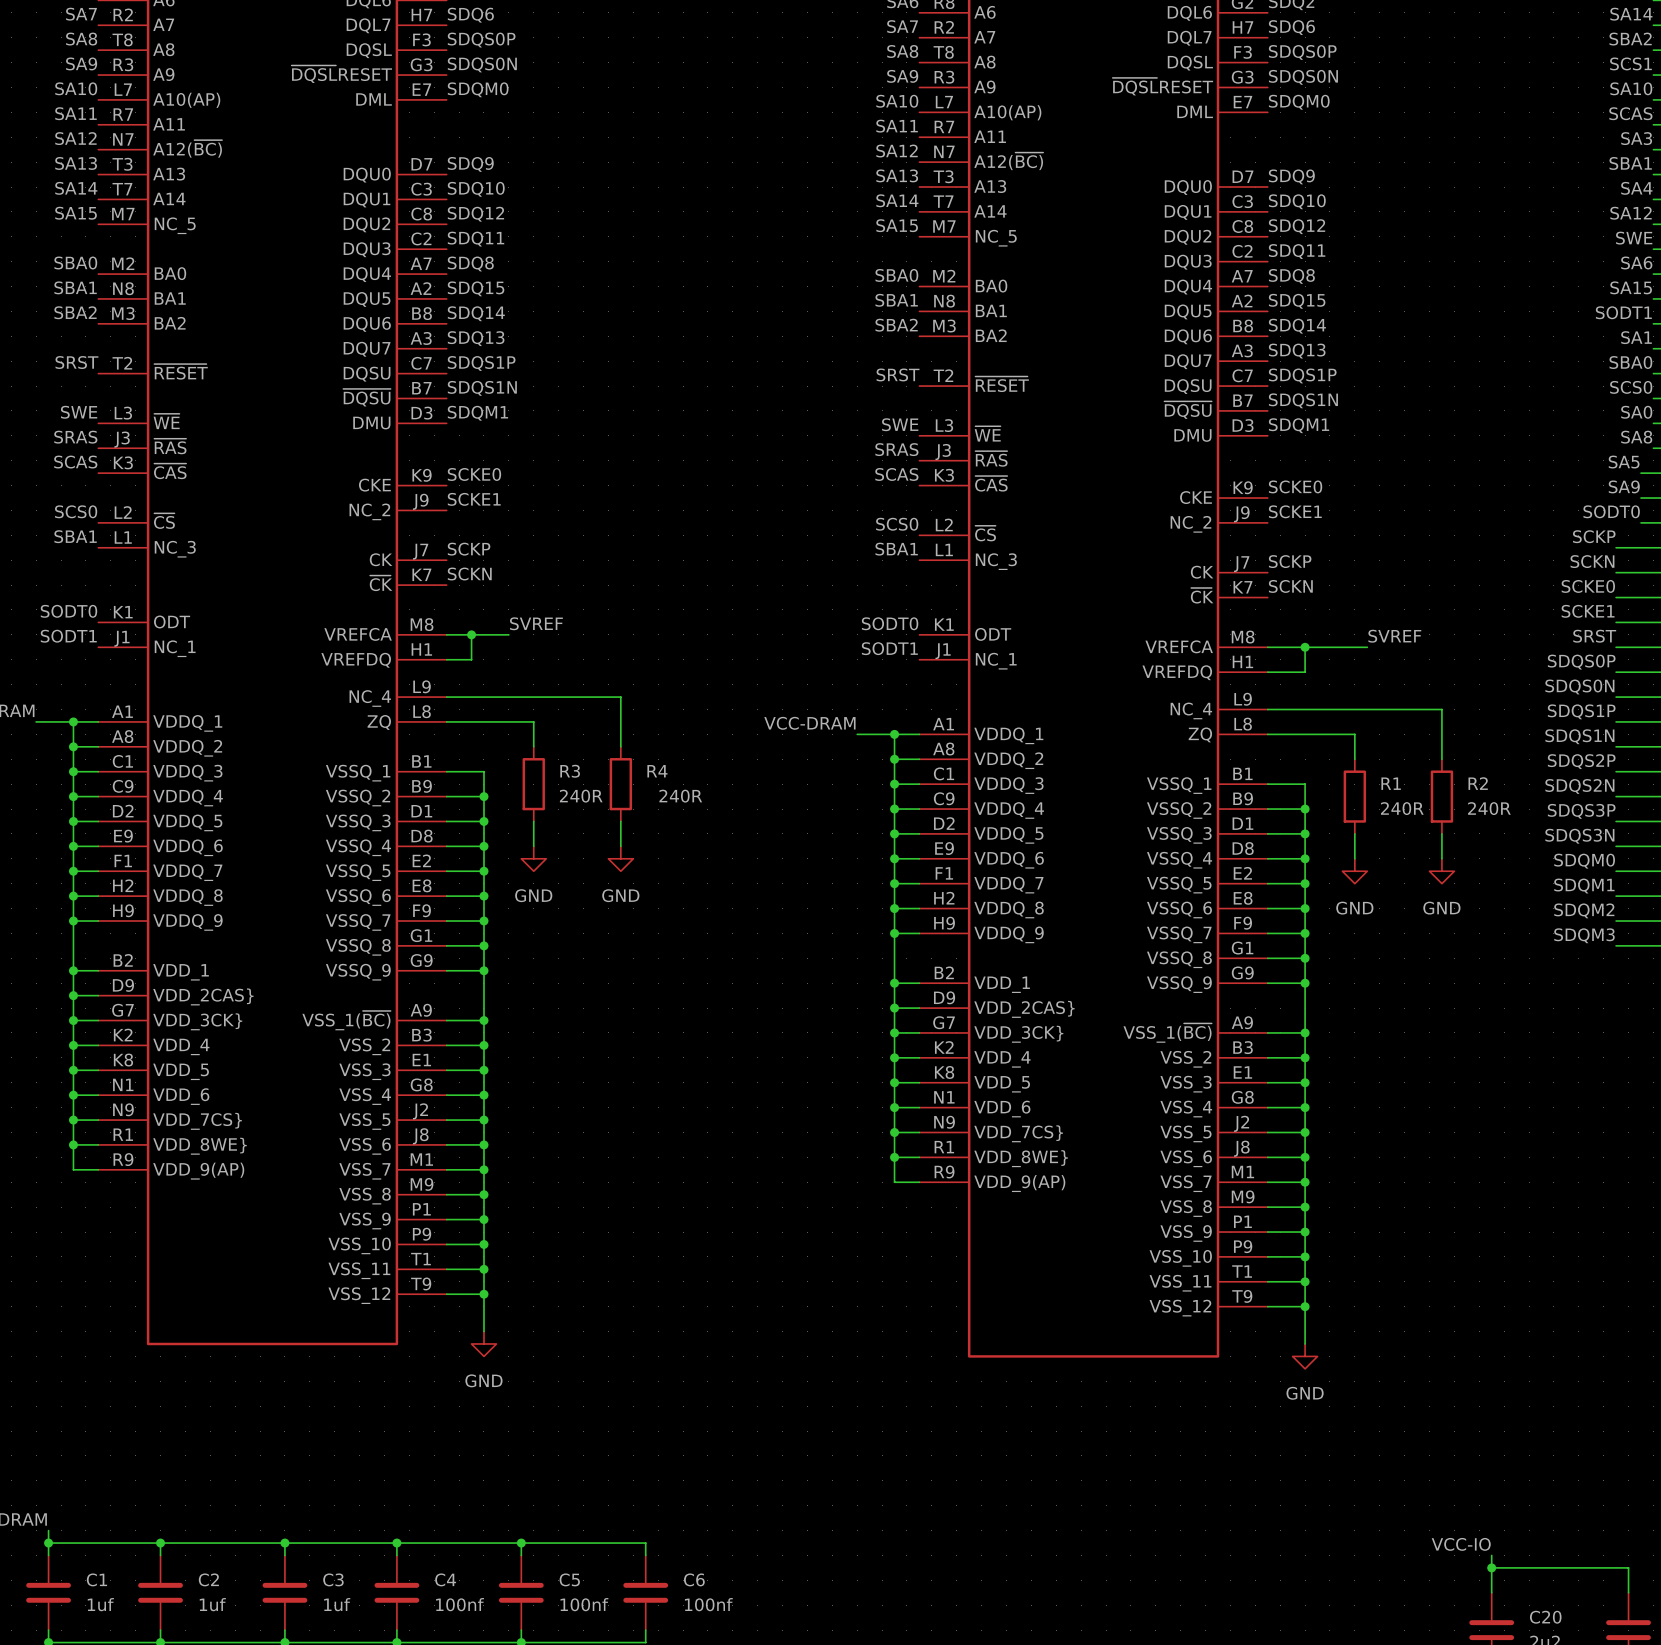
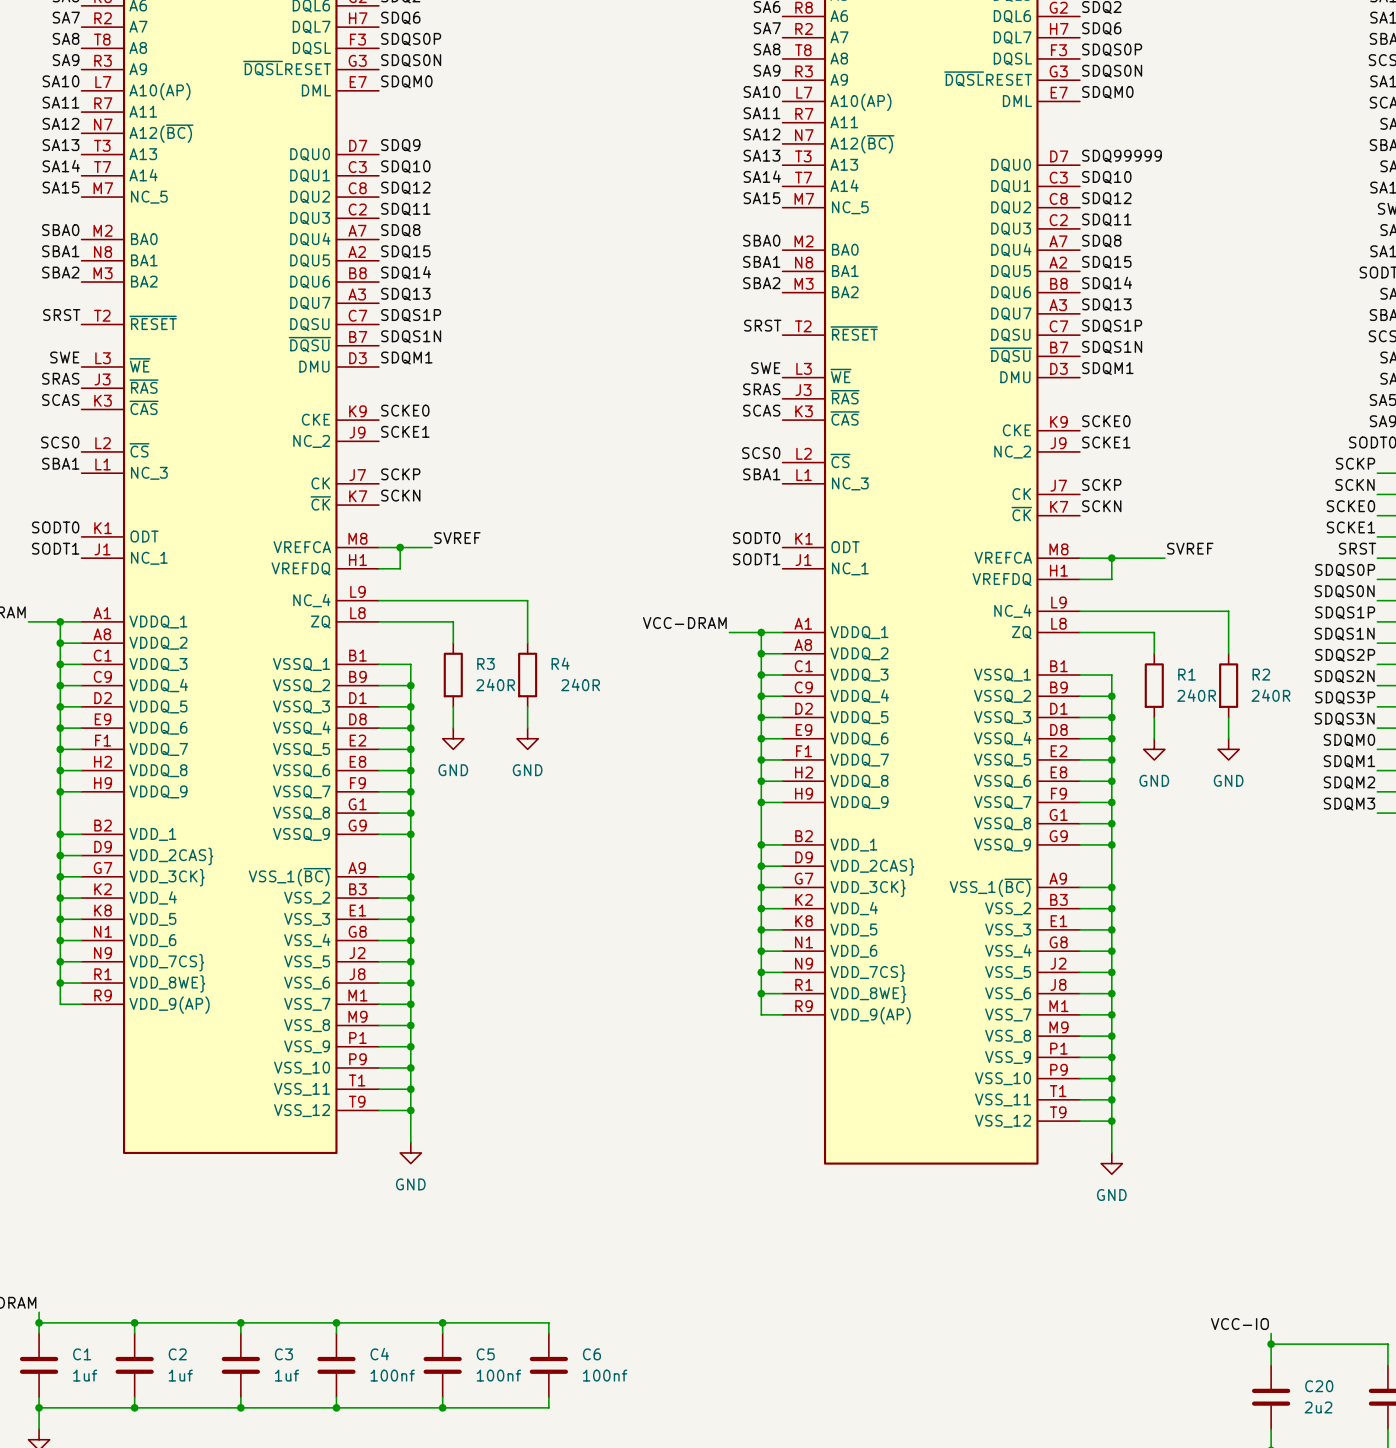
label: SDQ9 (1291, 176) -> SDQ99999 (1122, 156)

